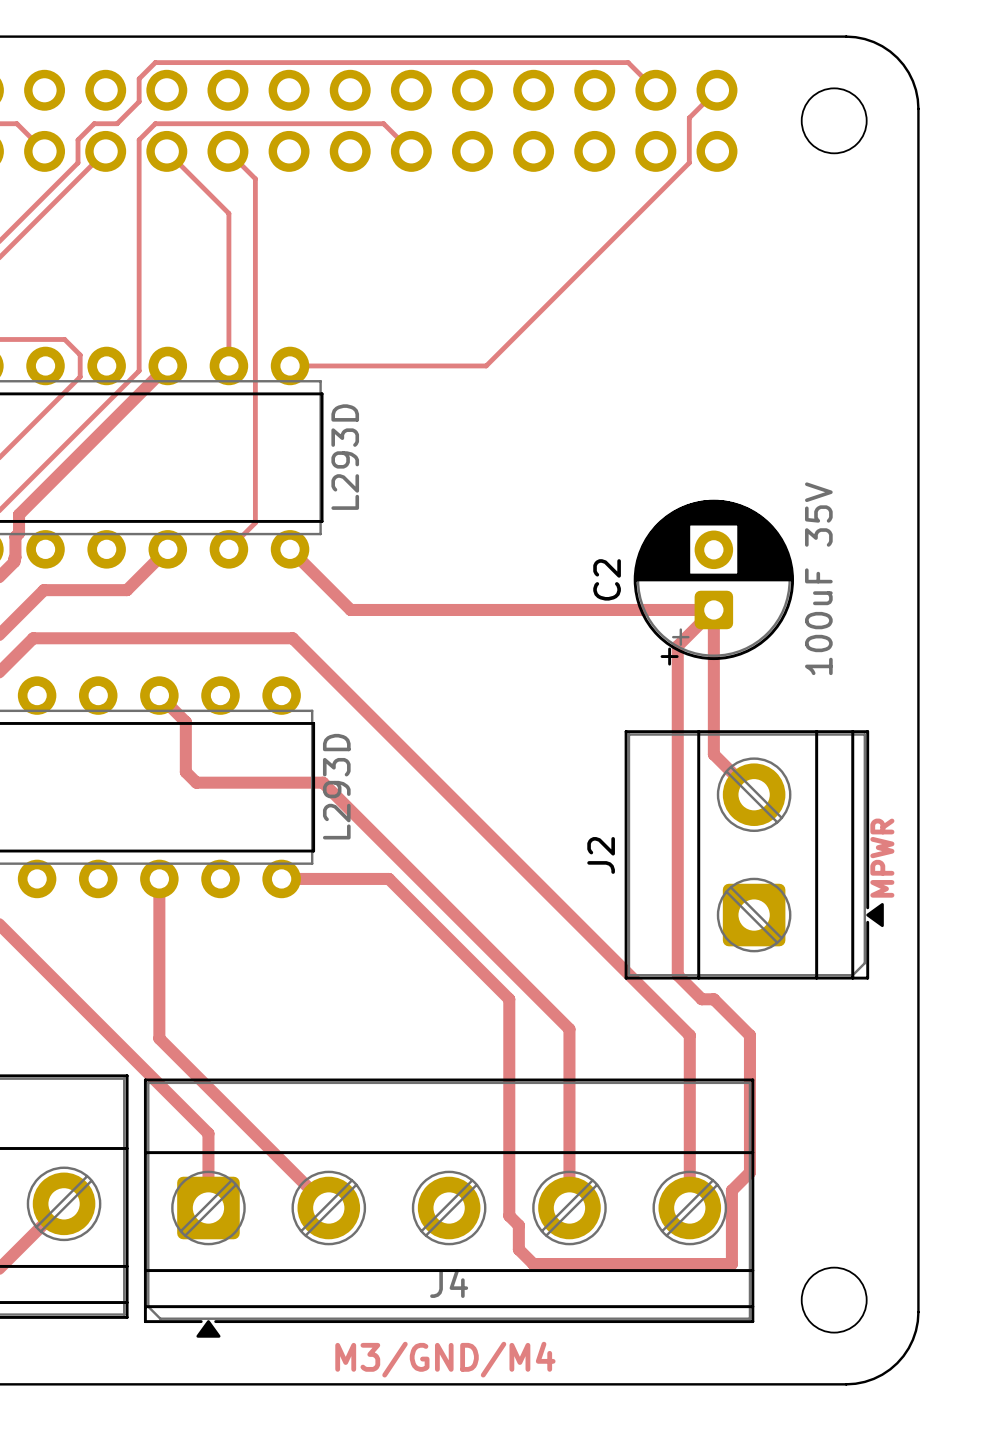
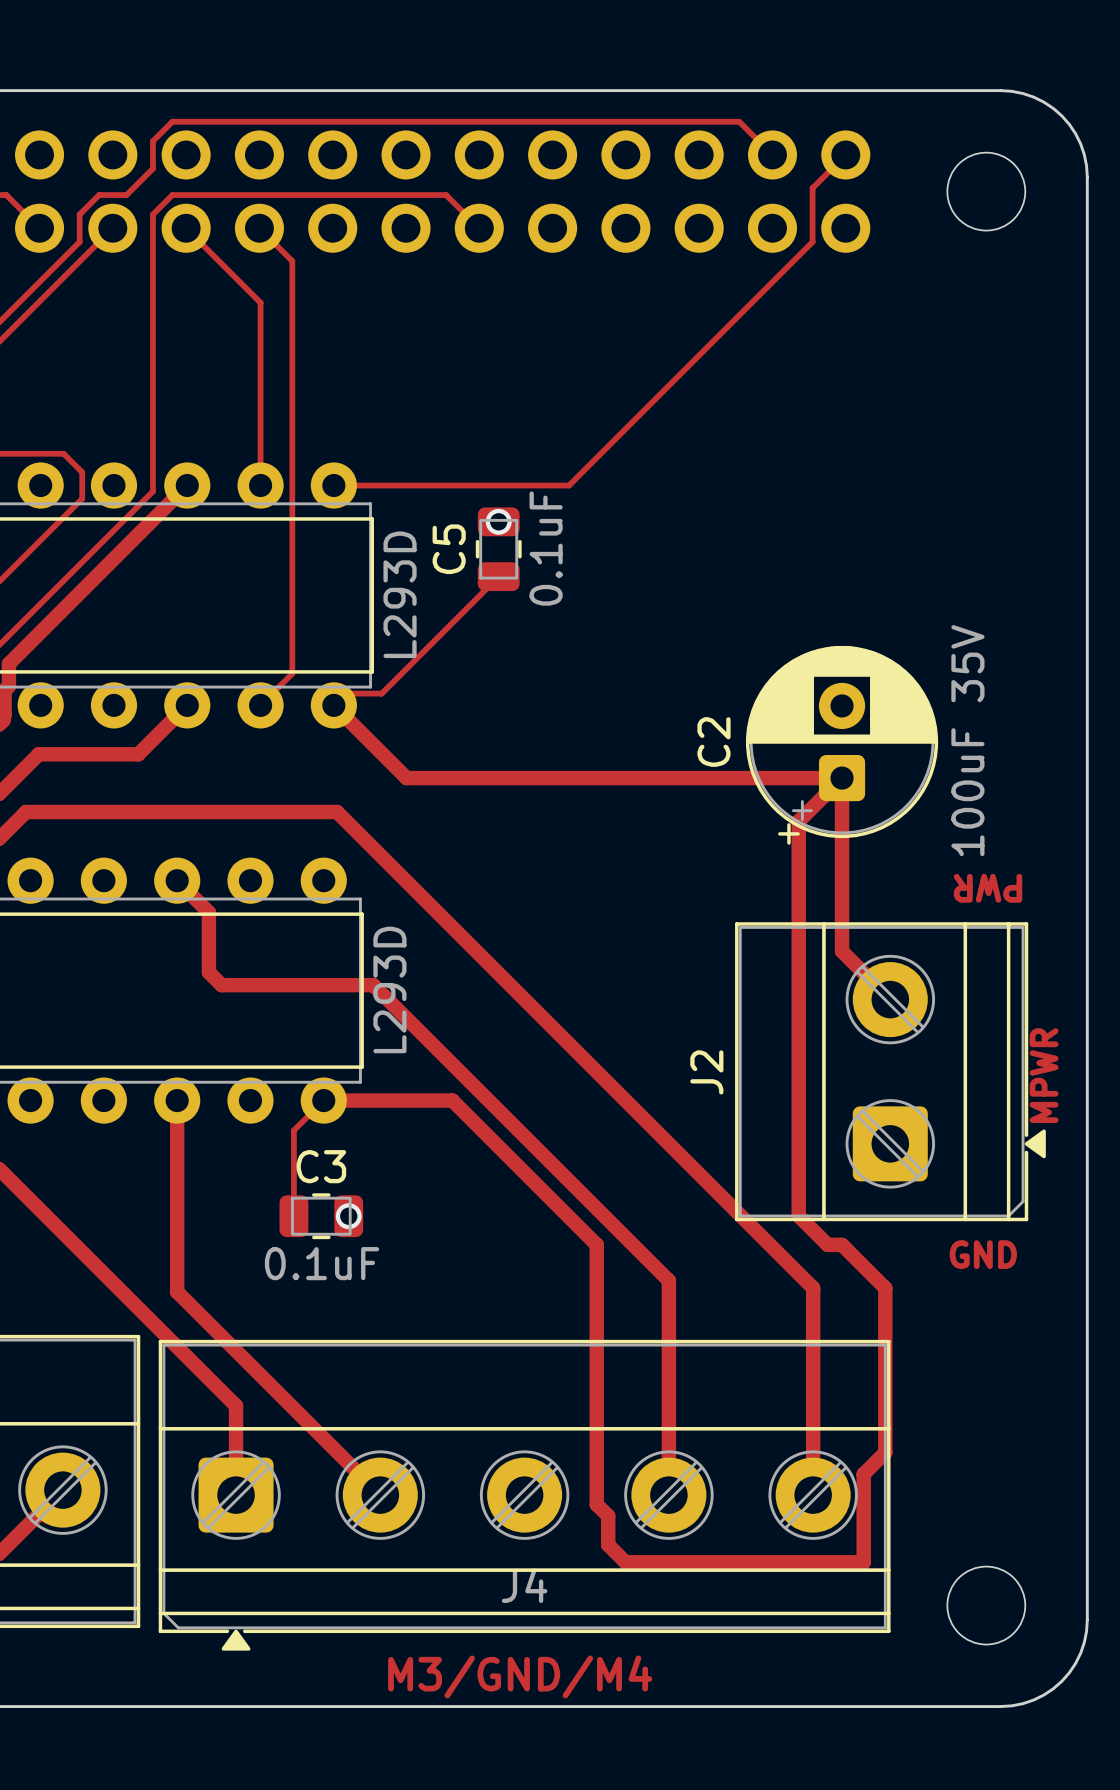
via: none -> (498, 521)
C5: none -> 0.1uF (498, 549)
track: none -> (490, 580) (490, 584) (381, 693) (345, 693) (333, 705)
text: none -> PWR (988, 888)
track: none -> (323, 1100) (293, 1130) (293, 1216)
C3: none -> 0.1uF (321, 1216)
via: none -> (348, 1216)
text: none -> GND (983, 1254)

